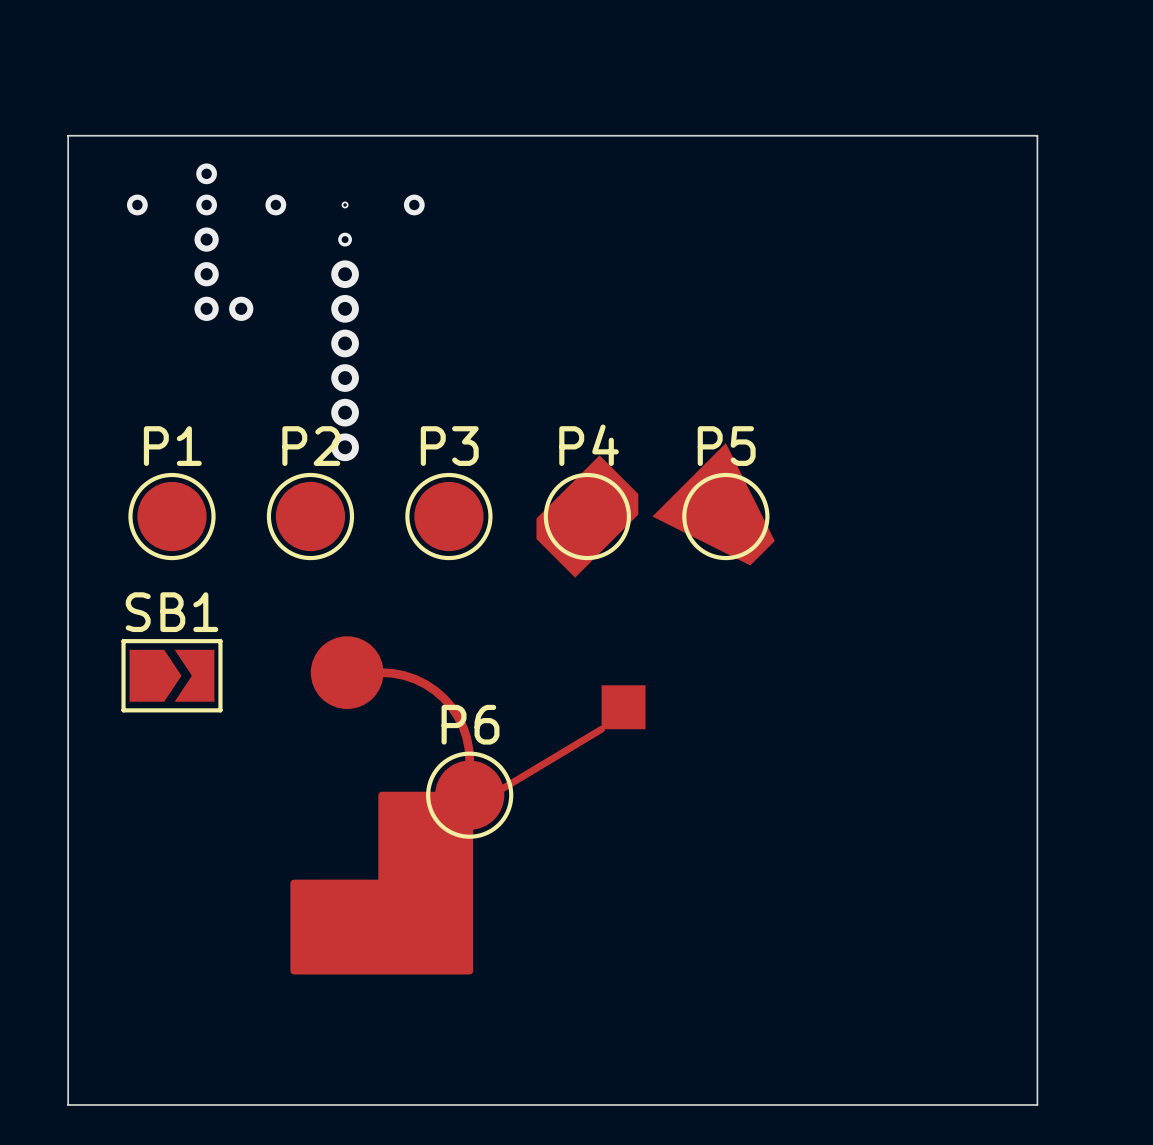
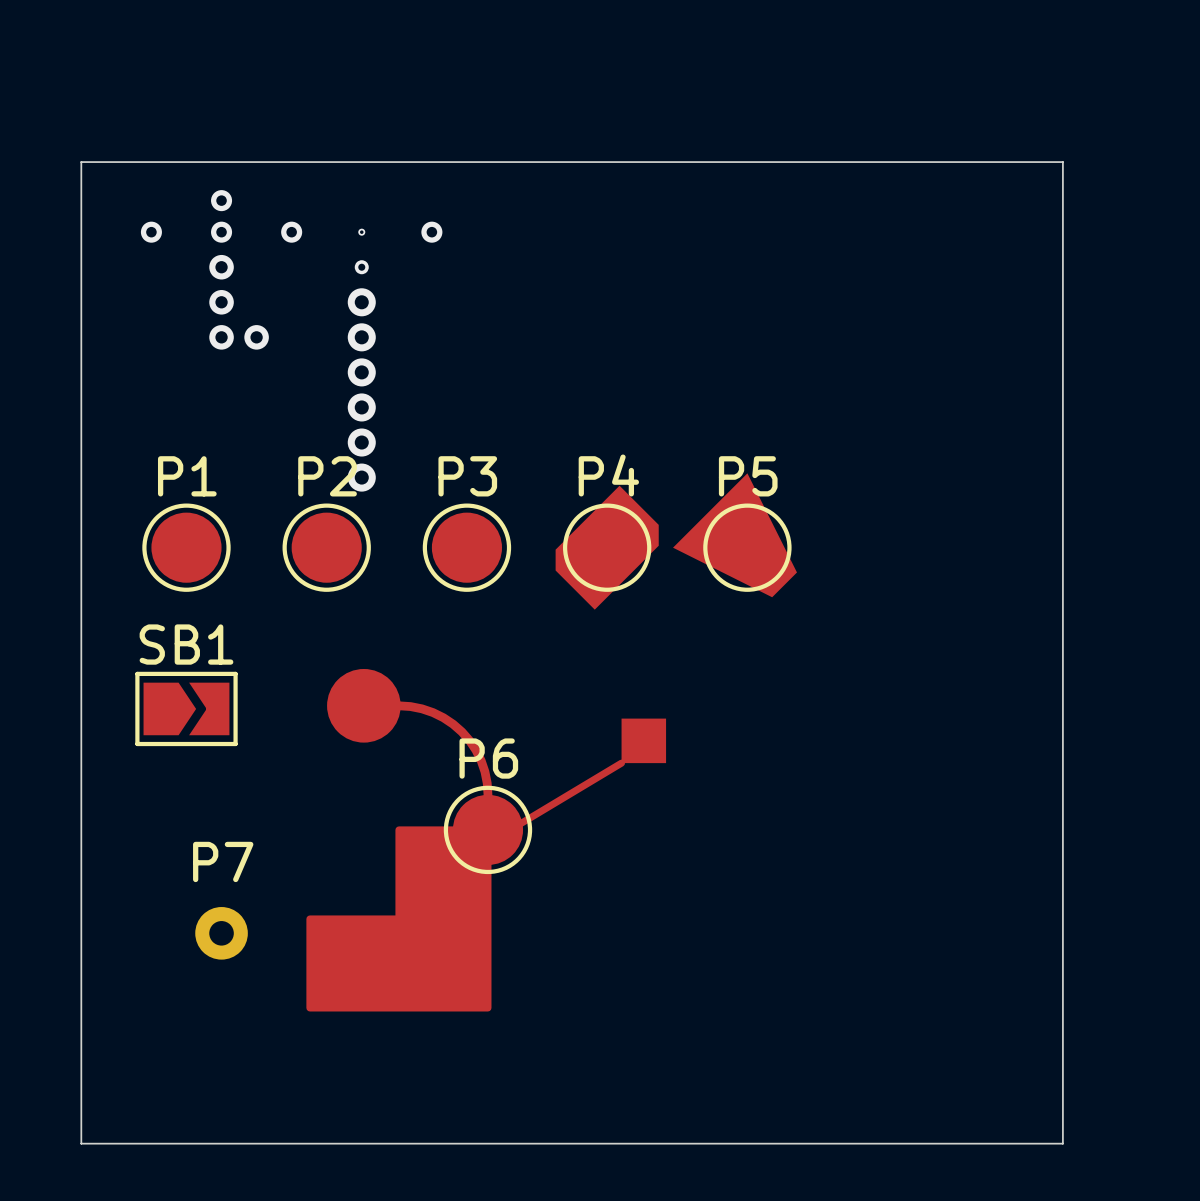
P7: none -> (221, 933)

